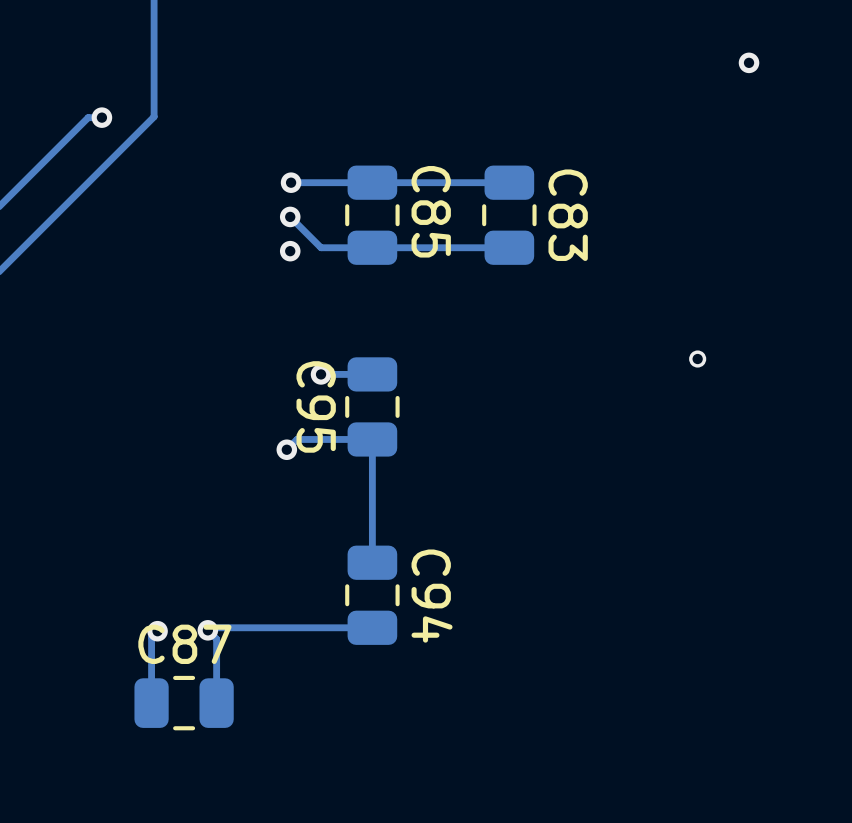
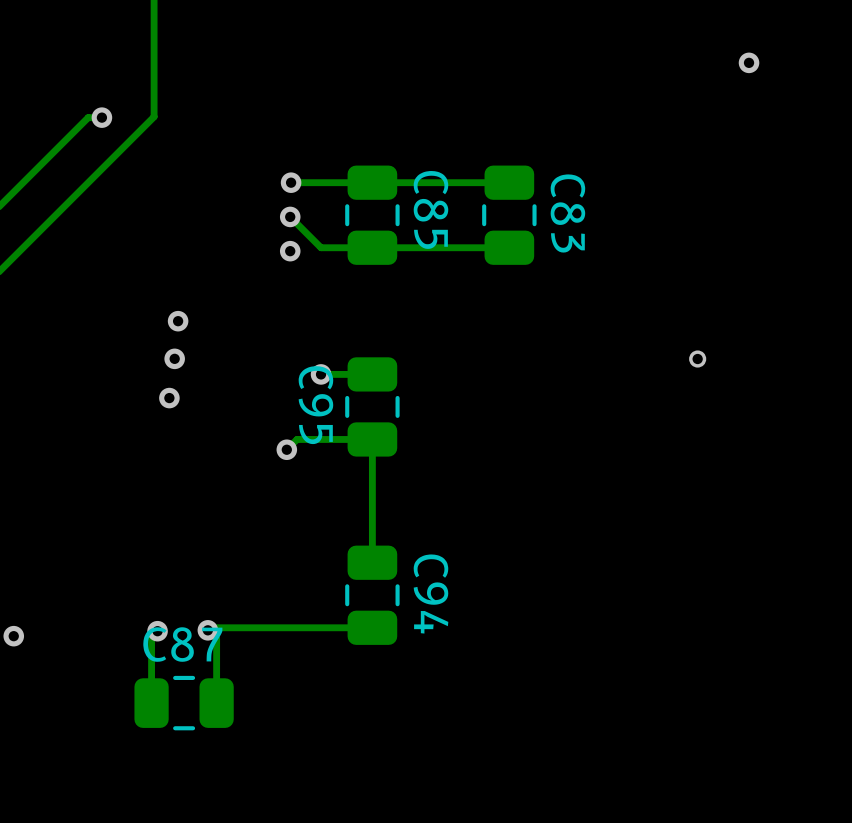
via: none -> (178, 321)
via: none -> (174, 358)
via: none -> (169, 398)
via: none -> (13, 636)

